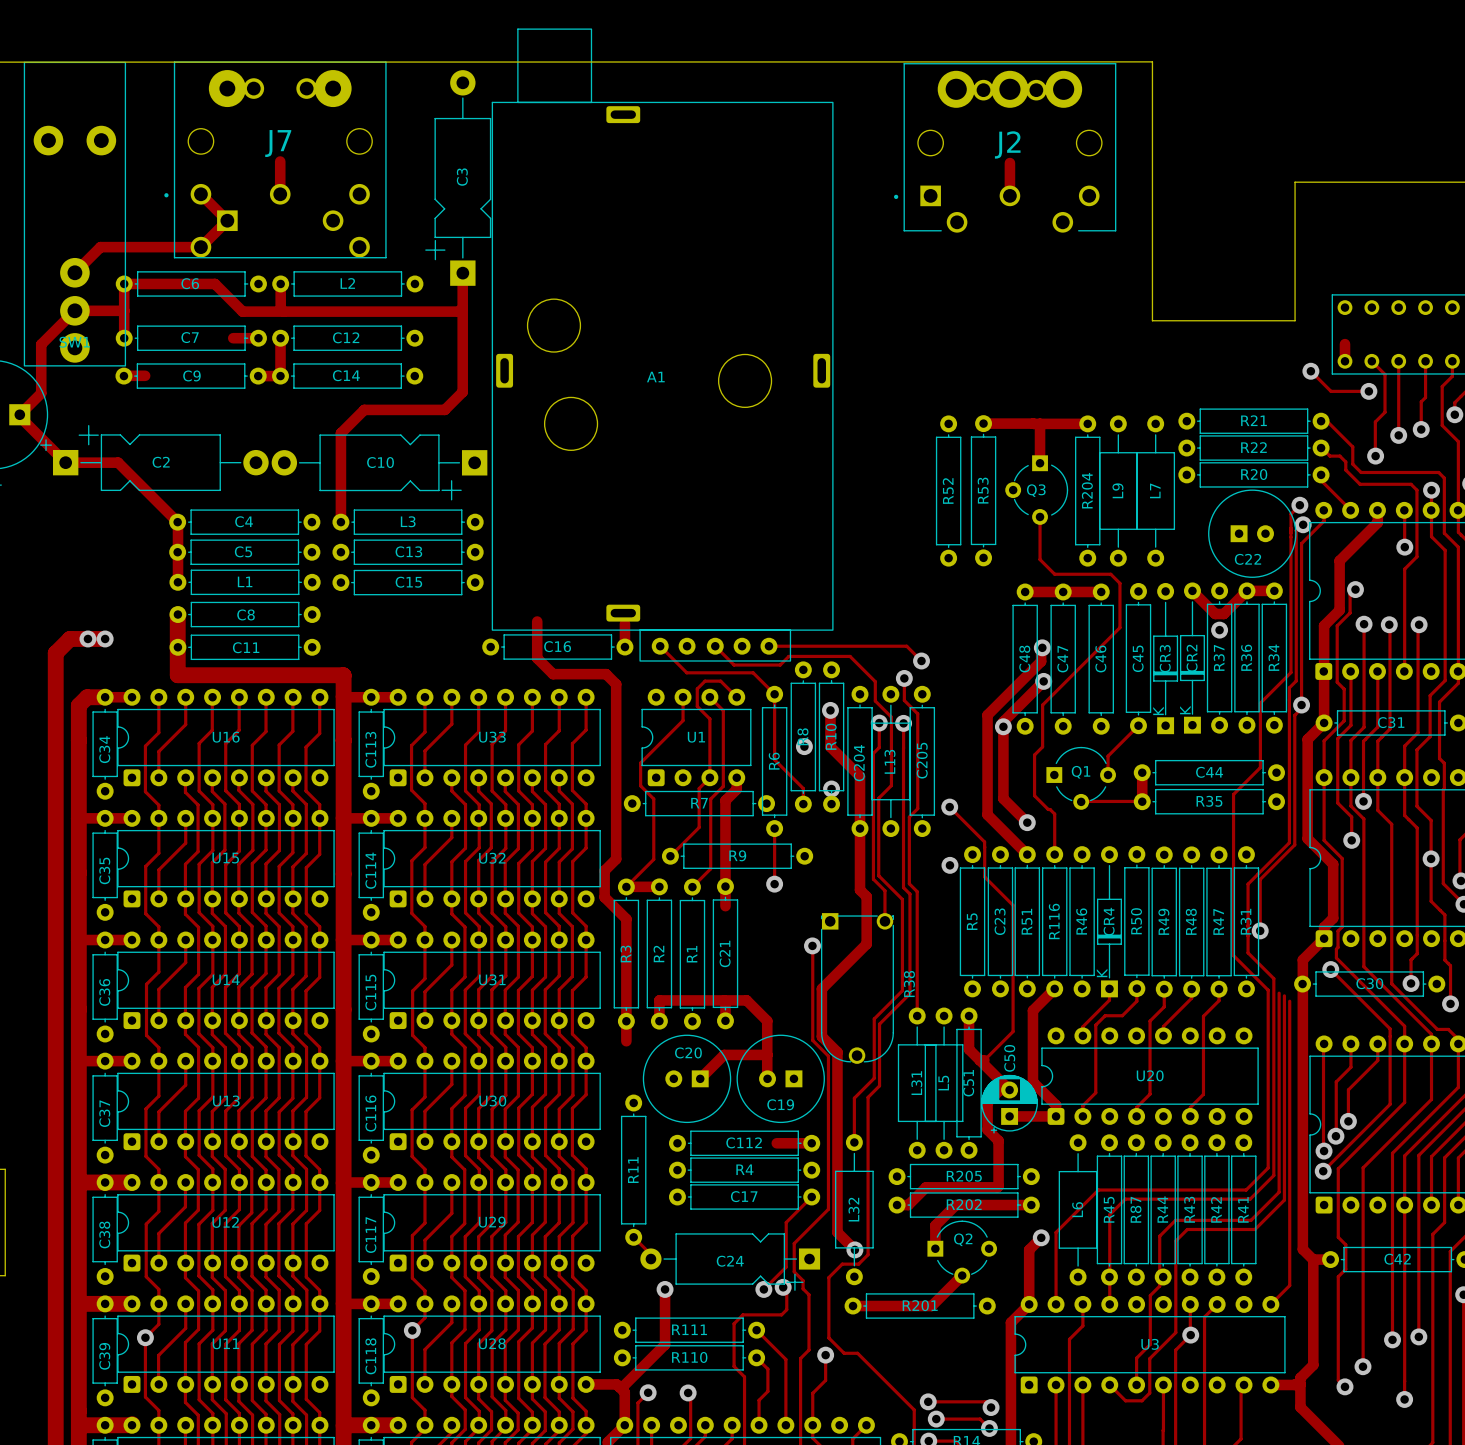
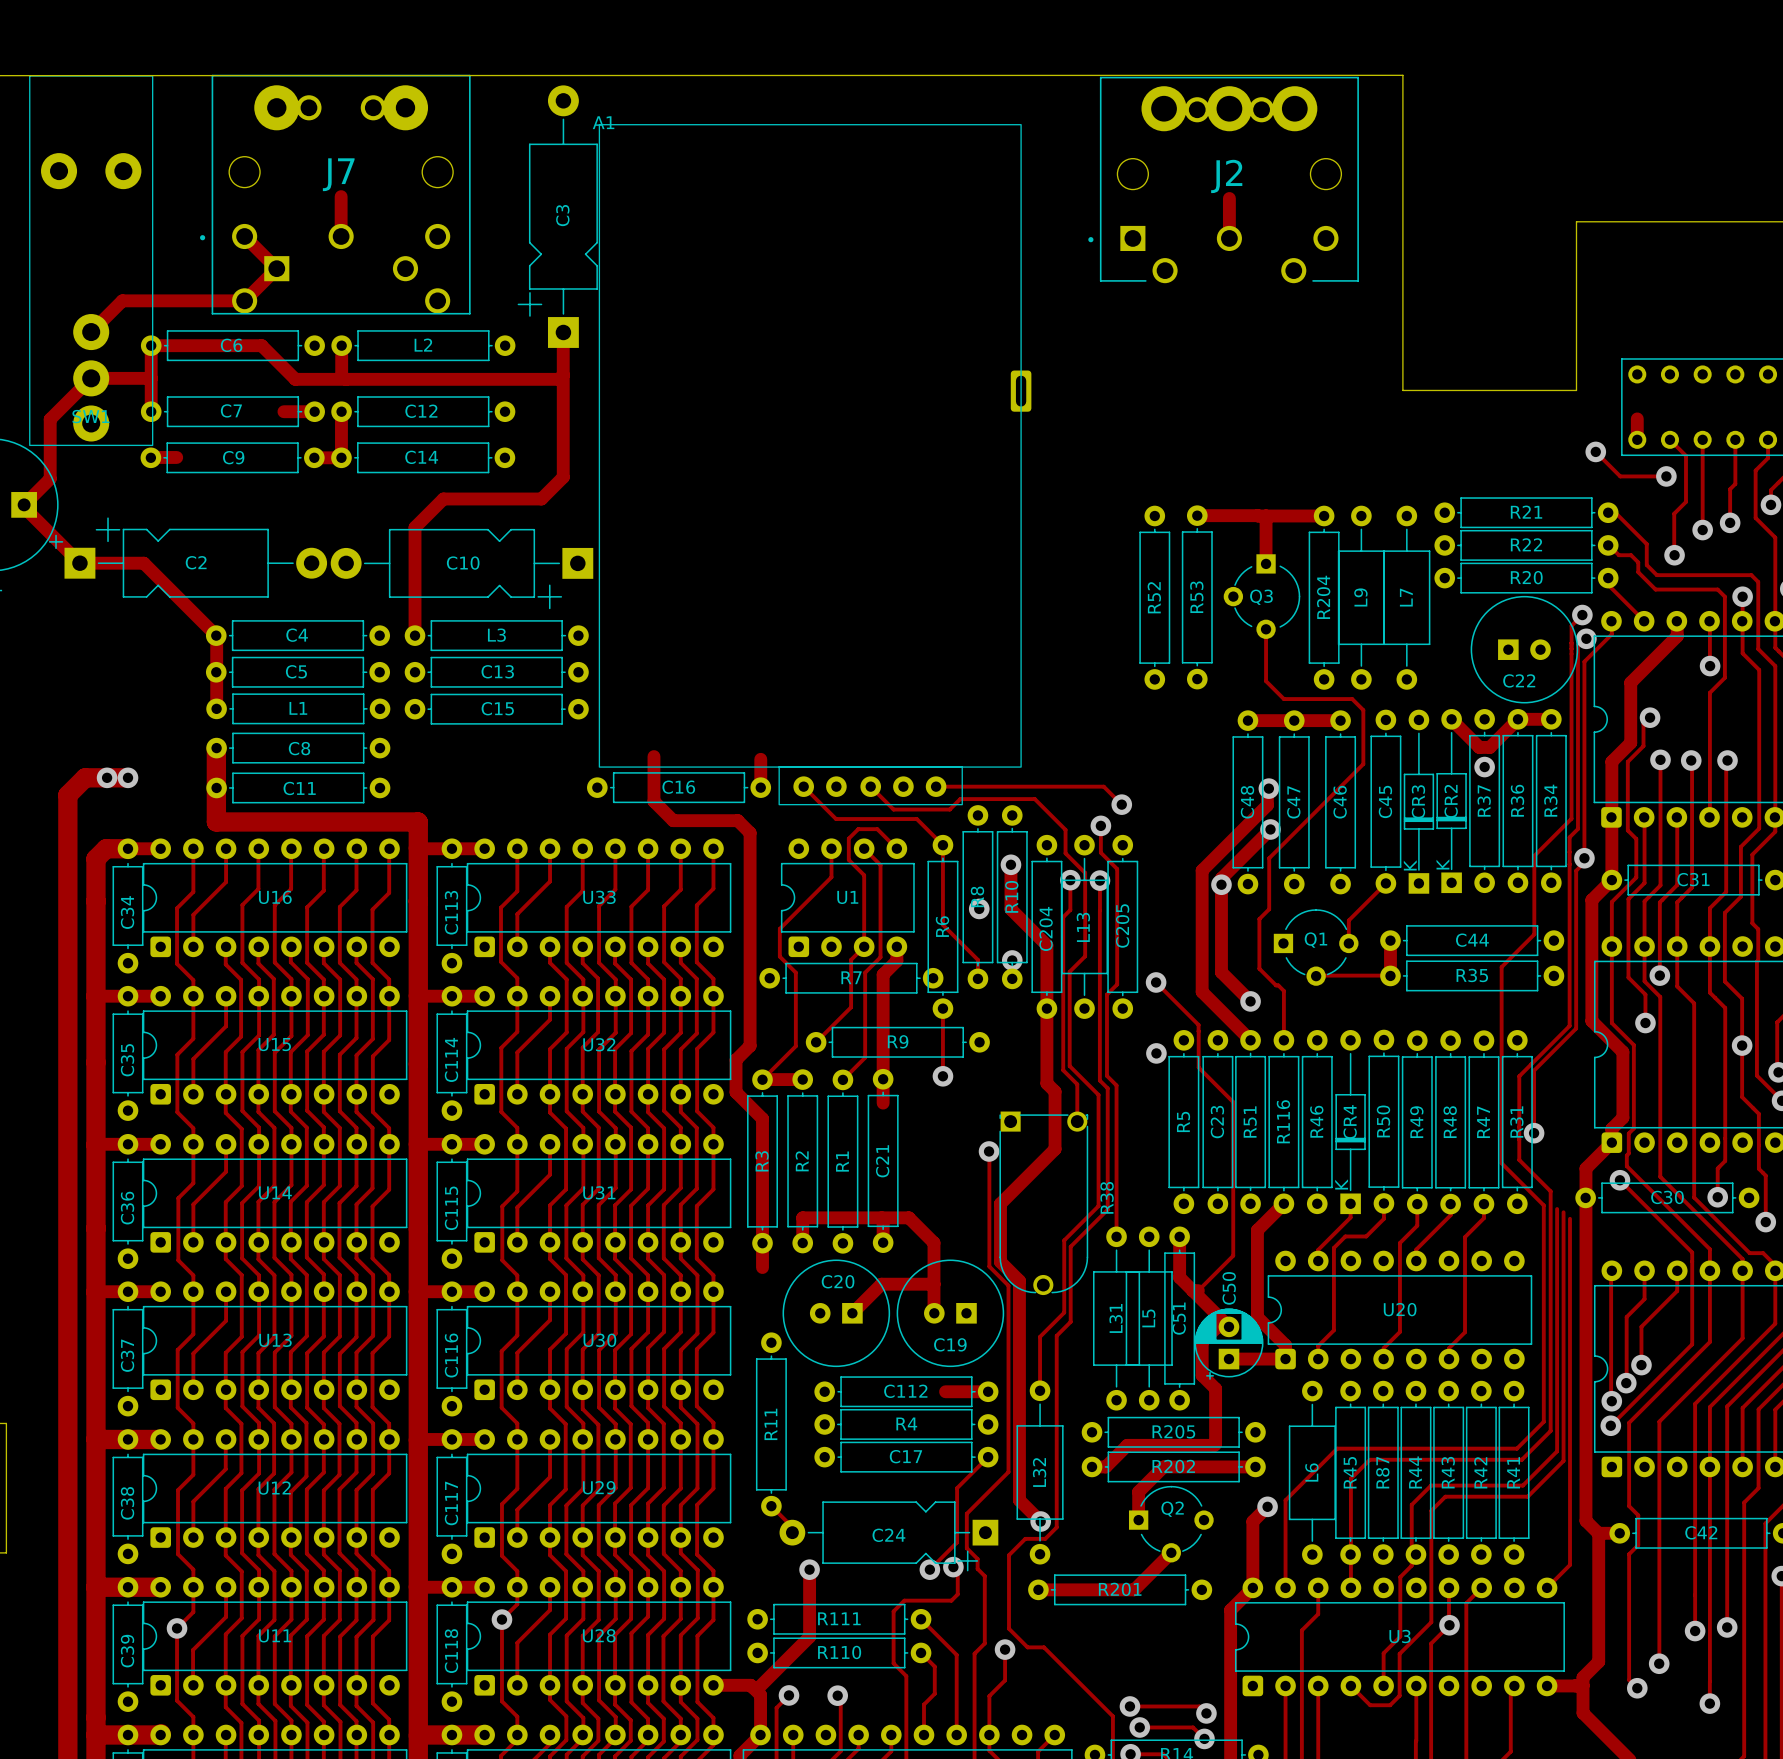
A1 footprint: [491, 28, 834, 662] -> [598, 124, 1032, 806]
A1 name position: A1 (655, 377) -> A1 (603, 122)

